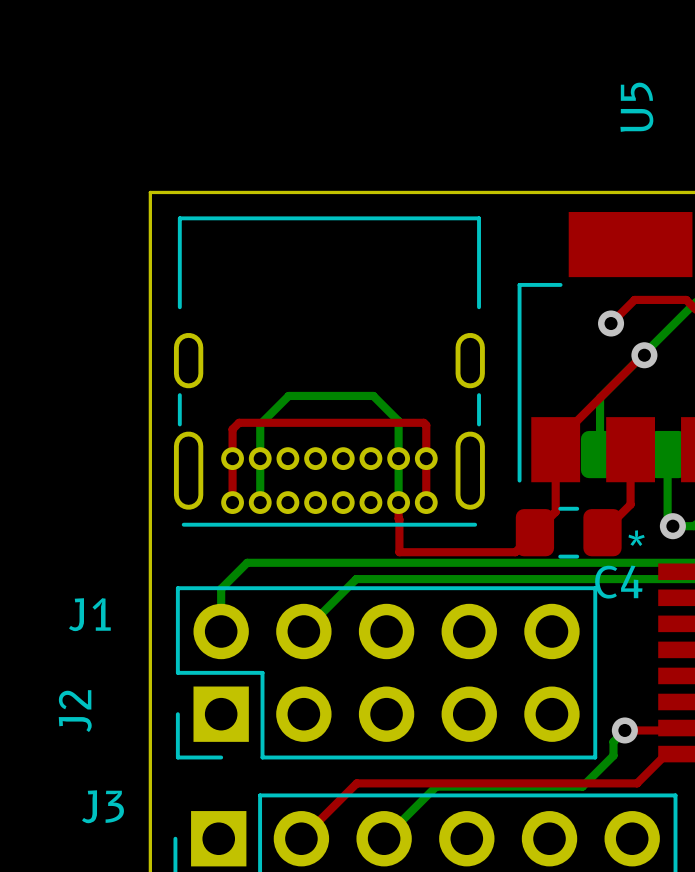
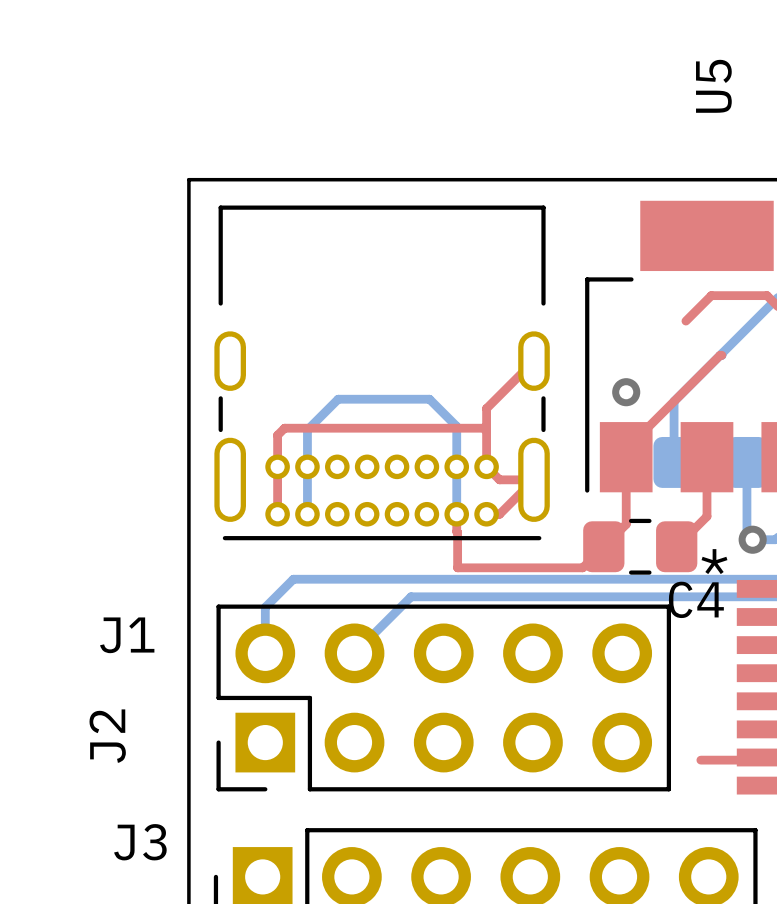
via: (611, 323) -> none
via: (644, 355) -> none
top track: none -> (534, 361) (486, 408) (486, 430)
via: none -> (626, 392)
top track: (426, 458) (426, 502) -> (486, 466) (499, 479) (534, 479) (499, 514) (486, 514)
bottom track: (624, 730) (613, 741) (613, 755) (582, 786) (436, 786) (384, 838) -> none
via: (624, 730) -> none
top track: (682, 754) (666, 754) (637, 783) (356, 783) (301, 838) -> none

